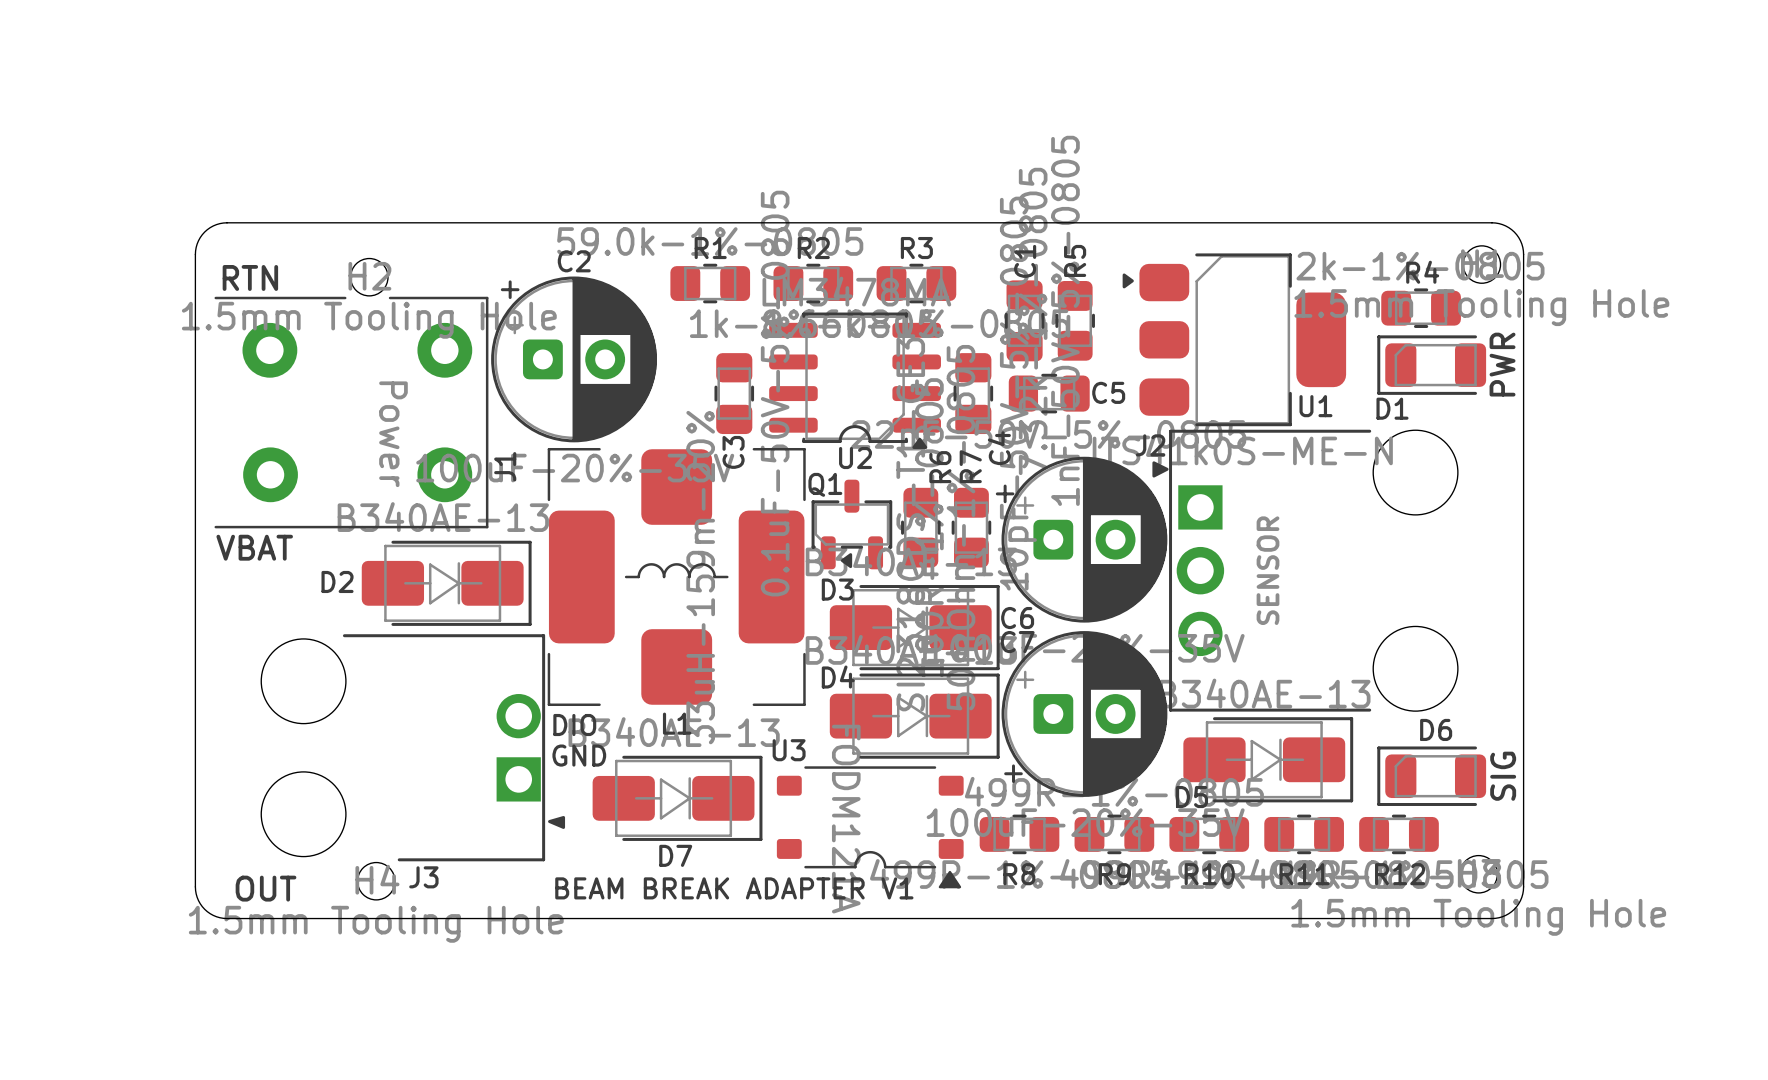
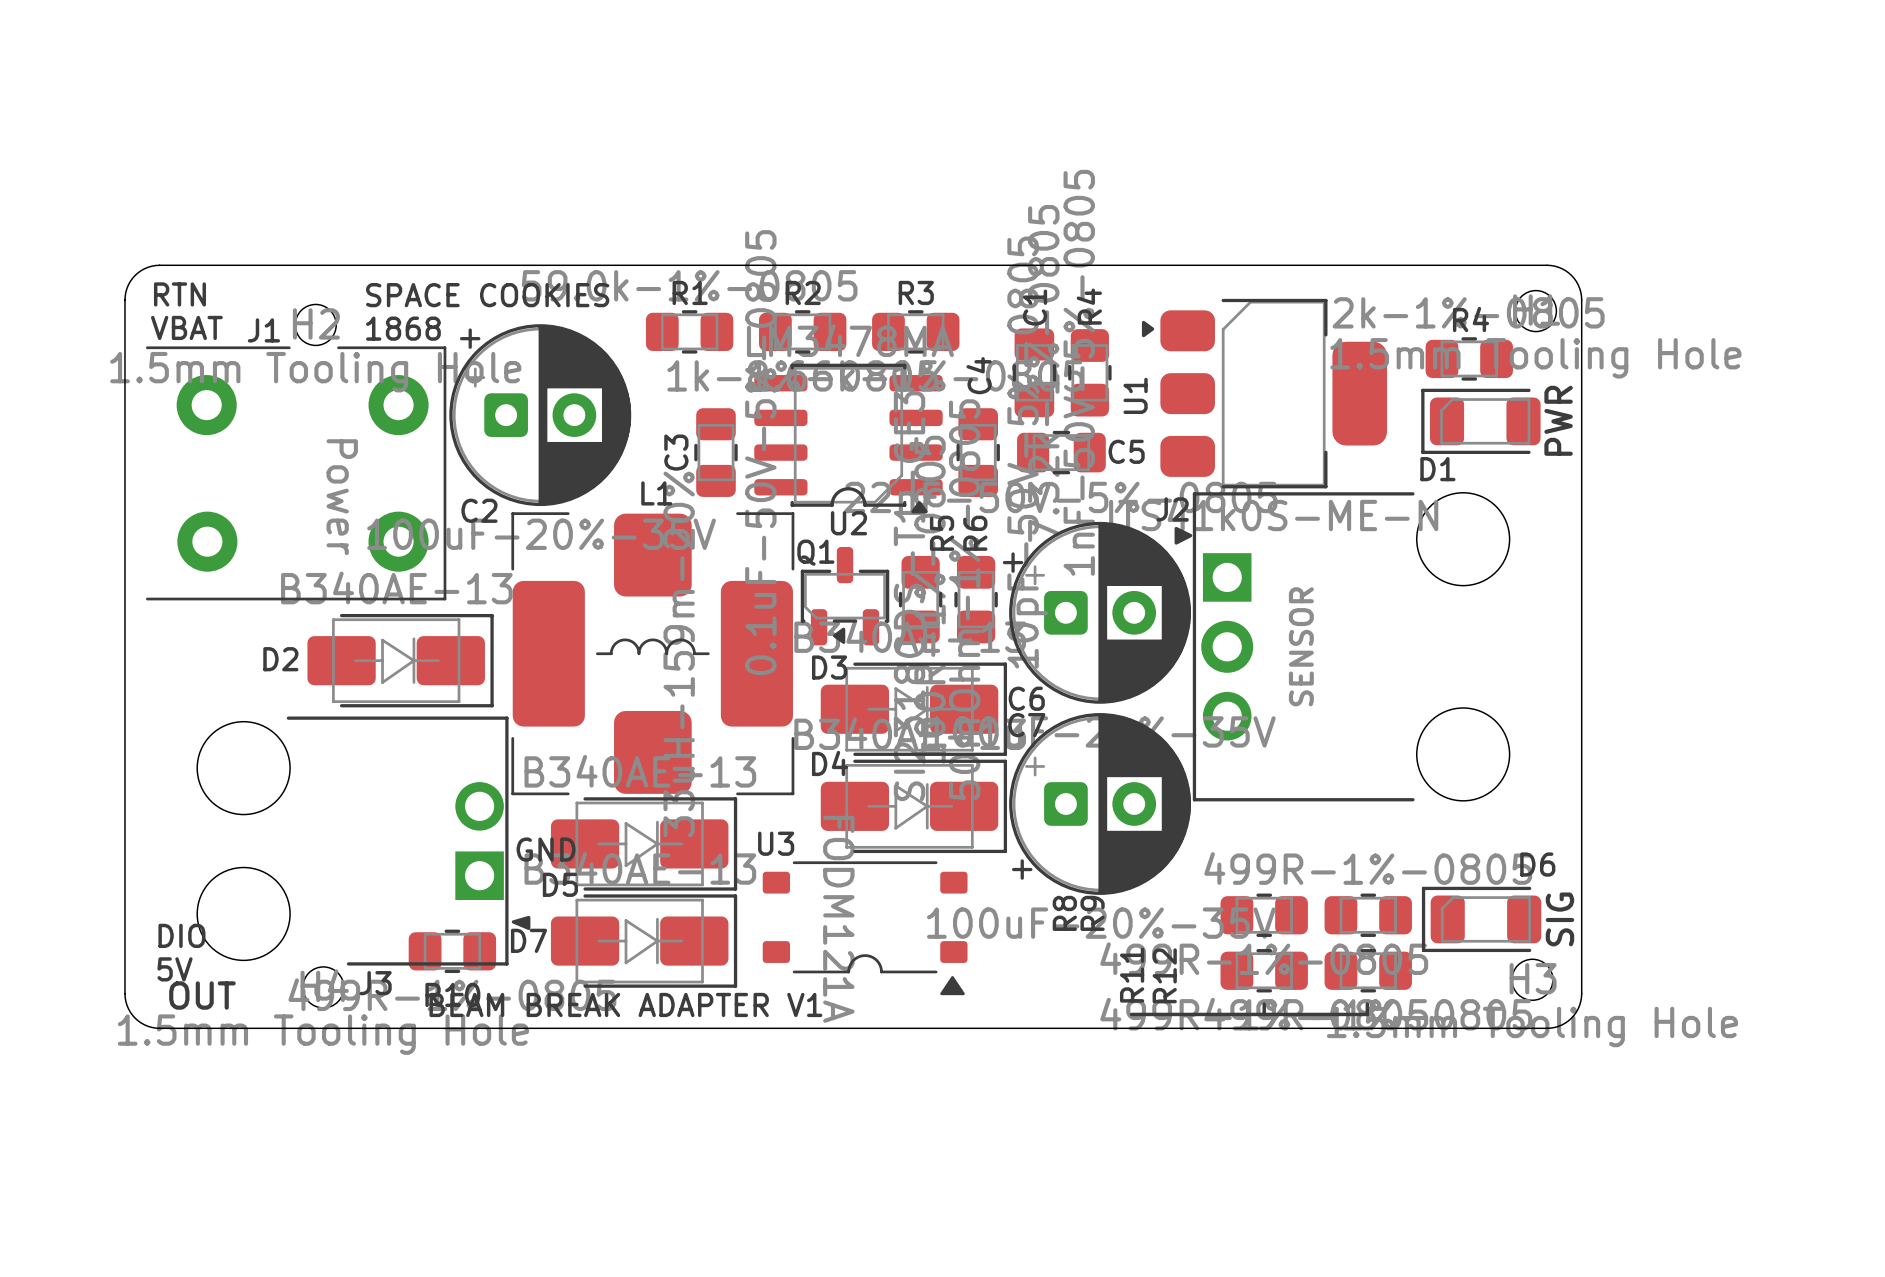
text: none -> RTN (179, 294)
text: none -> SPACE COOKIES (487, 295)
R5 name: R5 (1075, 260) -> R4 (1089, 306)
C2 name position: C2 (574, 261) -> C2 (479, 510)
text: RTN (250, 277) -> VBAT (186, 327)
text: none -> 1868 (403, 328)
U1 name rotation: 0° (1315, 406) -> 90° counterclockwise (1135, 395)
U1 name position: U1 (1315, 406) -> U1 (1135, 395)
C4 name position: C4 (999, 448) -> C4 (979, 375)
C3 name position: C3 (733, 452) -> C3 (676, 452)
J1 name rotation: 0° (505, 466) -> 90° clockwise (263, 330)
J1 name position: J1 (505, 466) -> J1 (263, 330)
R7 name: R7 (970, 466) -> R6 (975, 533)
R6 name: R6 (940, 467) -> R5 (942, 533)
text: VBAT (254, 547) -> none
L1 name position: L1 (677, 723) -> L1 (656, 493)
text position: DIO (574, 725) -> DIO (181, 935)
D6 name position: D6 (1436, 729) -> D6 (1537, 864)
D5 position: (1268, 759) -> (644, 843)
D6 position: (1431, 776) -> (1481, 919)
D7 position: (677, 798) -> (644, 941)
R8 position: (1019, 834) -> (1264, 915)
R9 position: (1114, 834) -> (1368, 915)
R10 position: (1209, 834) -> (452, 951)
R11 position: (1304, 834) -> (1264, 970)
R12 position: (1399, 834) -> (1368, 970)
D7 name position: D7 (675, 855) -> D7 (528, 940)
text: none -> 5V (175, 969)
R8 name rotation: 0° (1019, 874) -> 90° counterclockwise (1064, 913)
R8 name position: R8 (1019, 874) -> R8 (1064, 913)
R9 name rotation: 0° (1114, 874) -> 90° counterclockwise (1092, 913)
R9 name position: R9 (1114, 874) -> R9 (1092, 913)
R11 name rotation: 0° (1304, 874) -> 90° counterclockwise (1132, 975)
R11 name position: R11 (1304, 874) -> R11 (1132, 975)
R12 name rotation: 0° (1400, 874) -> 90° counterclockwise (1164, 975)
R12 name position: R12 (1400, 874) -> R12 (1164, 975)
text position: BEAM BREAK ADAPTER V1 (734, 888) -> BEAM BREAK ADAPTER V1 (625, 1004)
line: none -> (1264, 1004) (1264, 1014)
line: none -> (1367, 1004) (1367, 1014) (1131, 1014)

